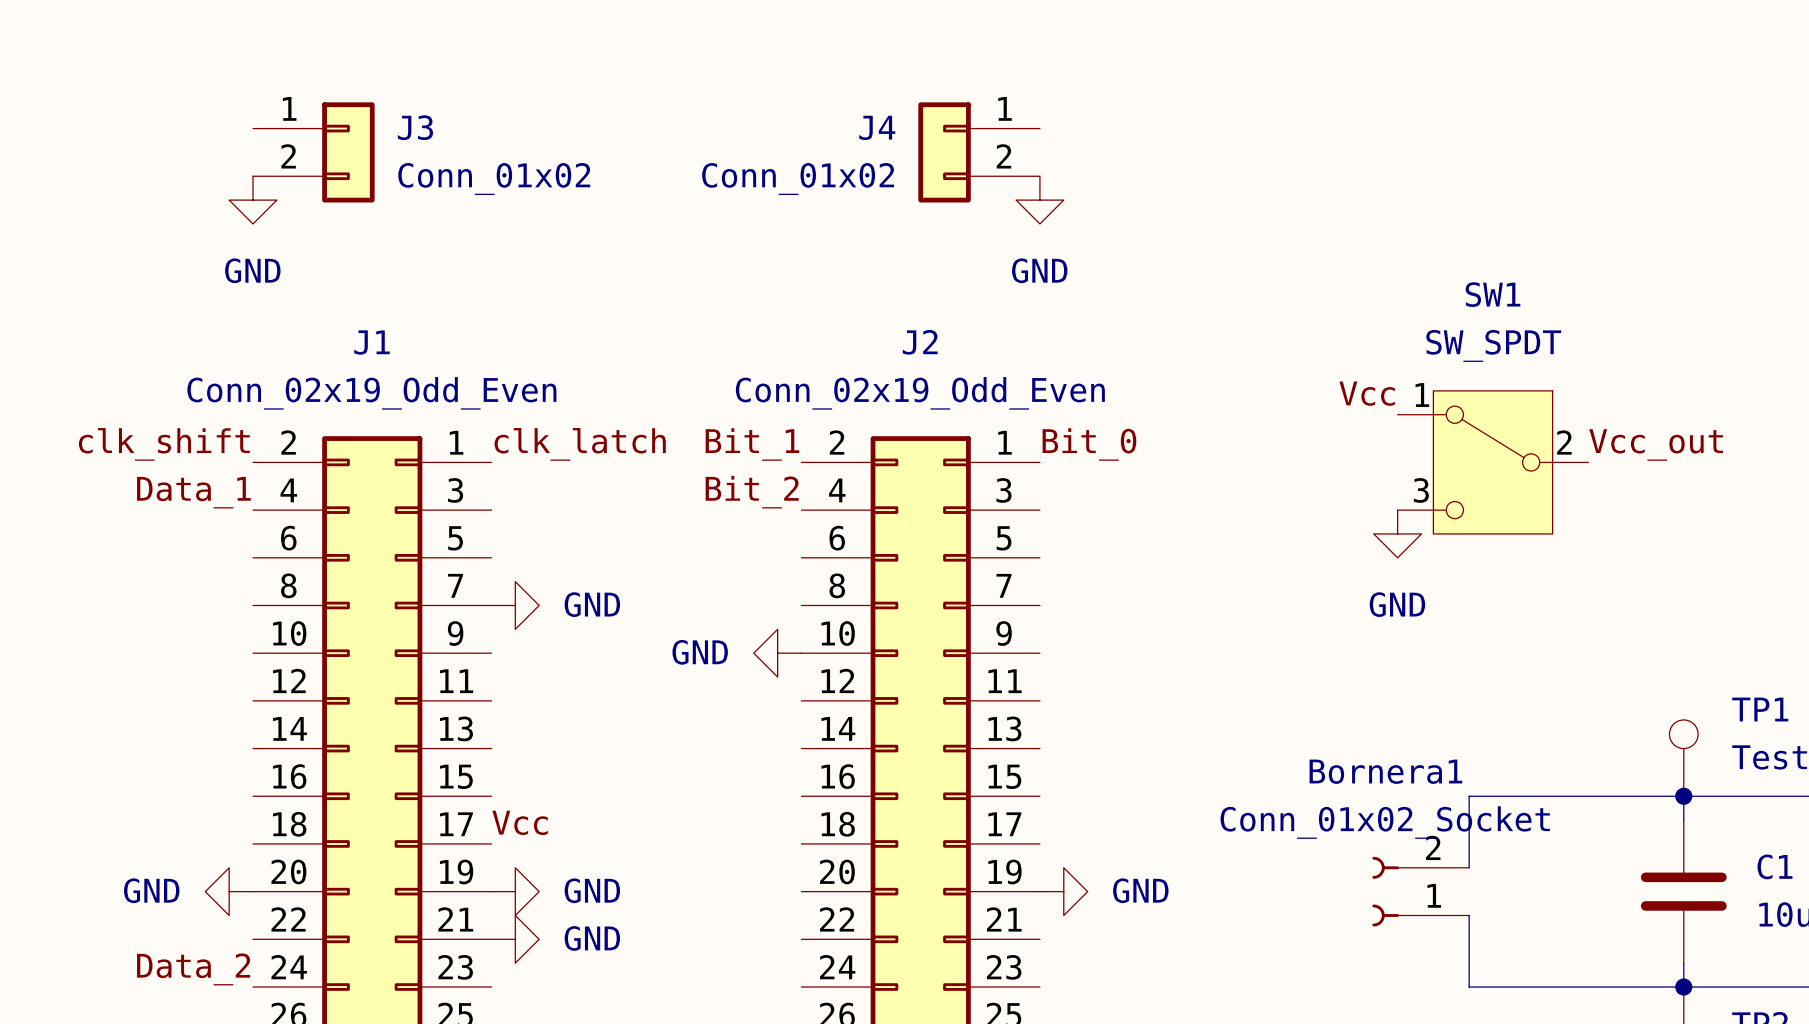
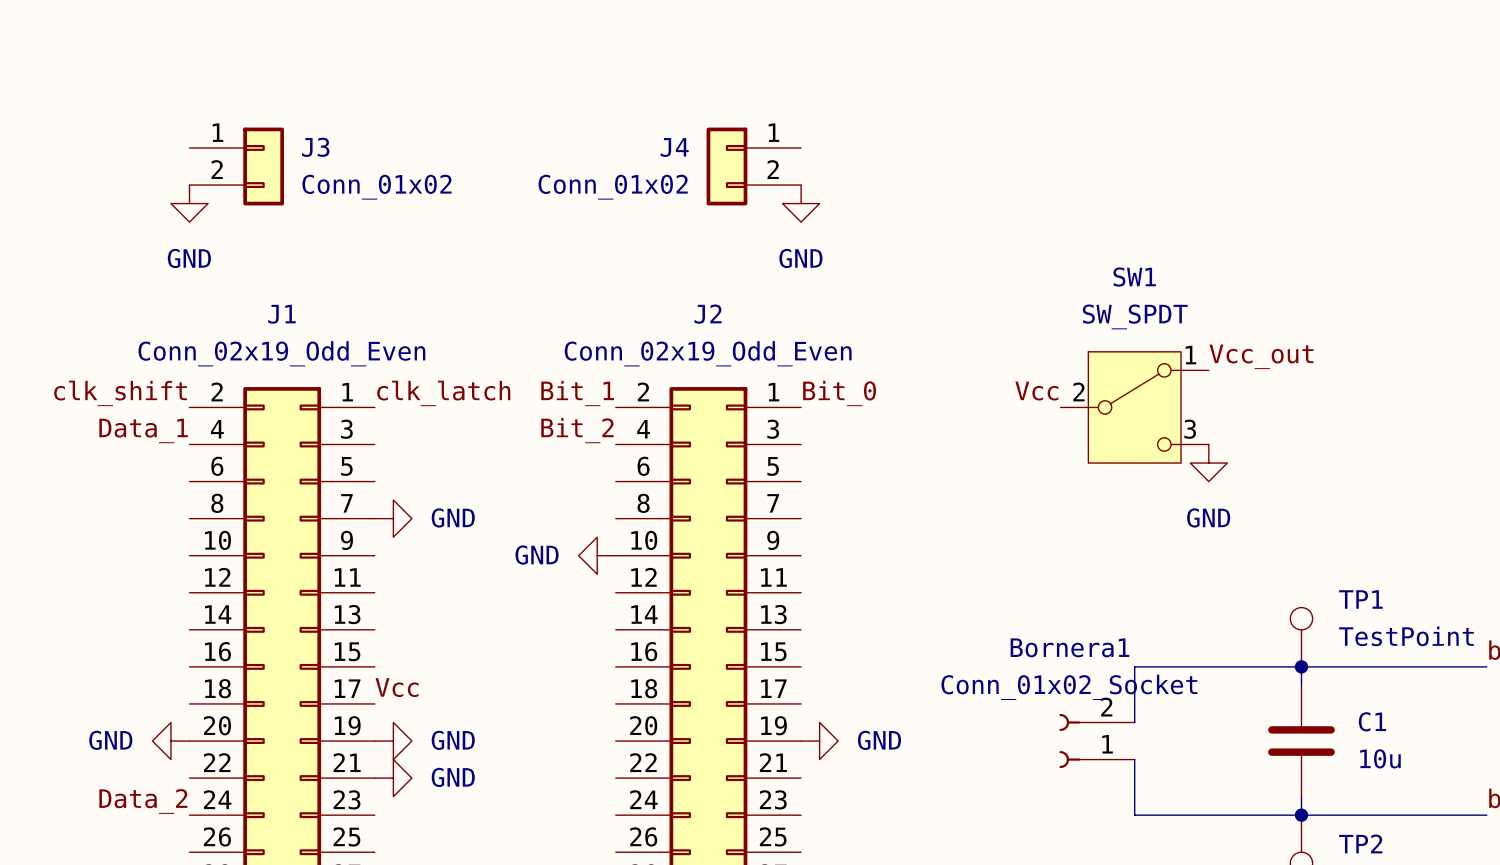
label position: Vcc (1367, 393) -> Vcc (1036, 391)
label position: Vcc_out (1656, 444) -> Vcc_out (1261, 356)
SW1 flip: as is (1493, 462) -> left-right (1134, 407)
power symbol position: GND (1397, 533) -> GND (1208, 463)

